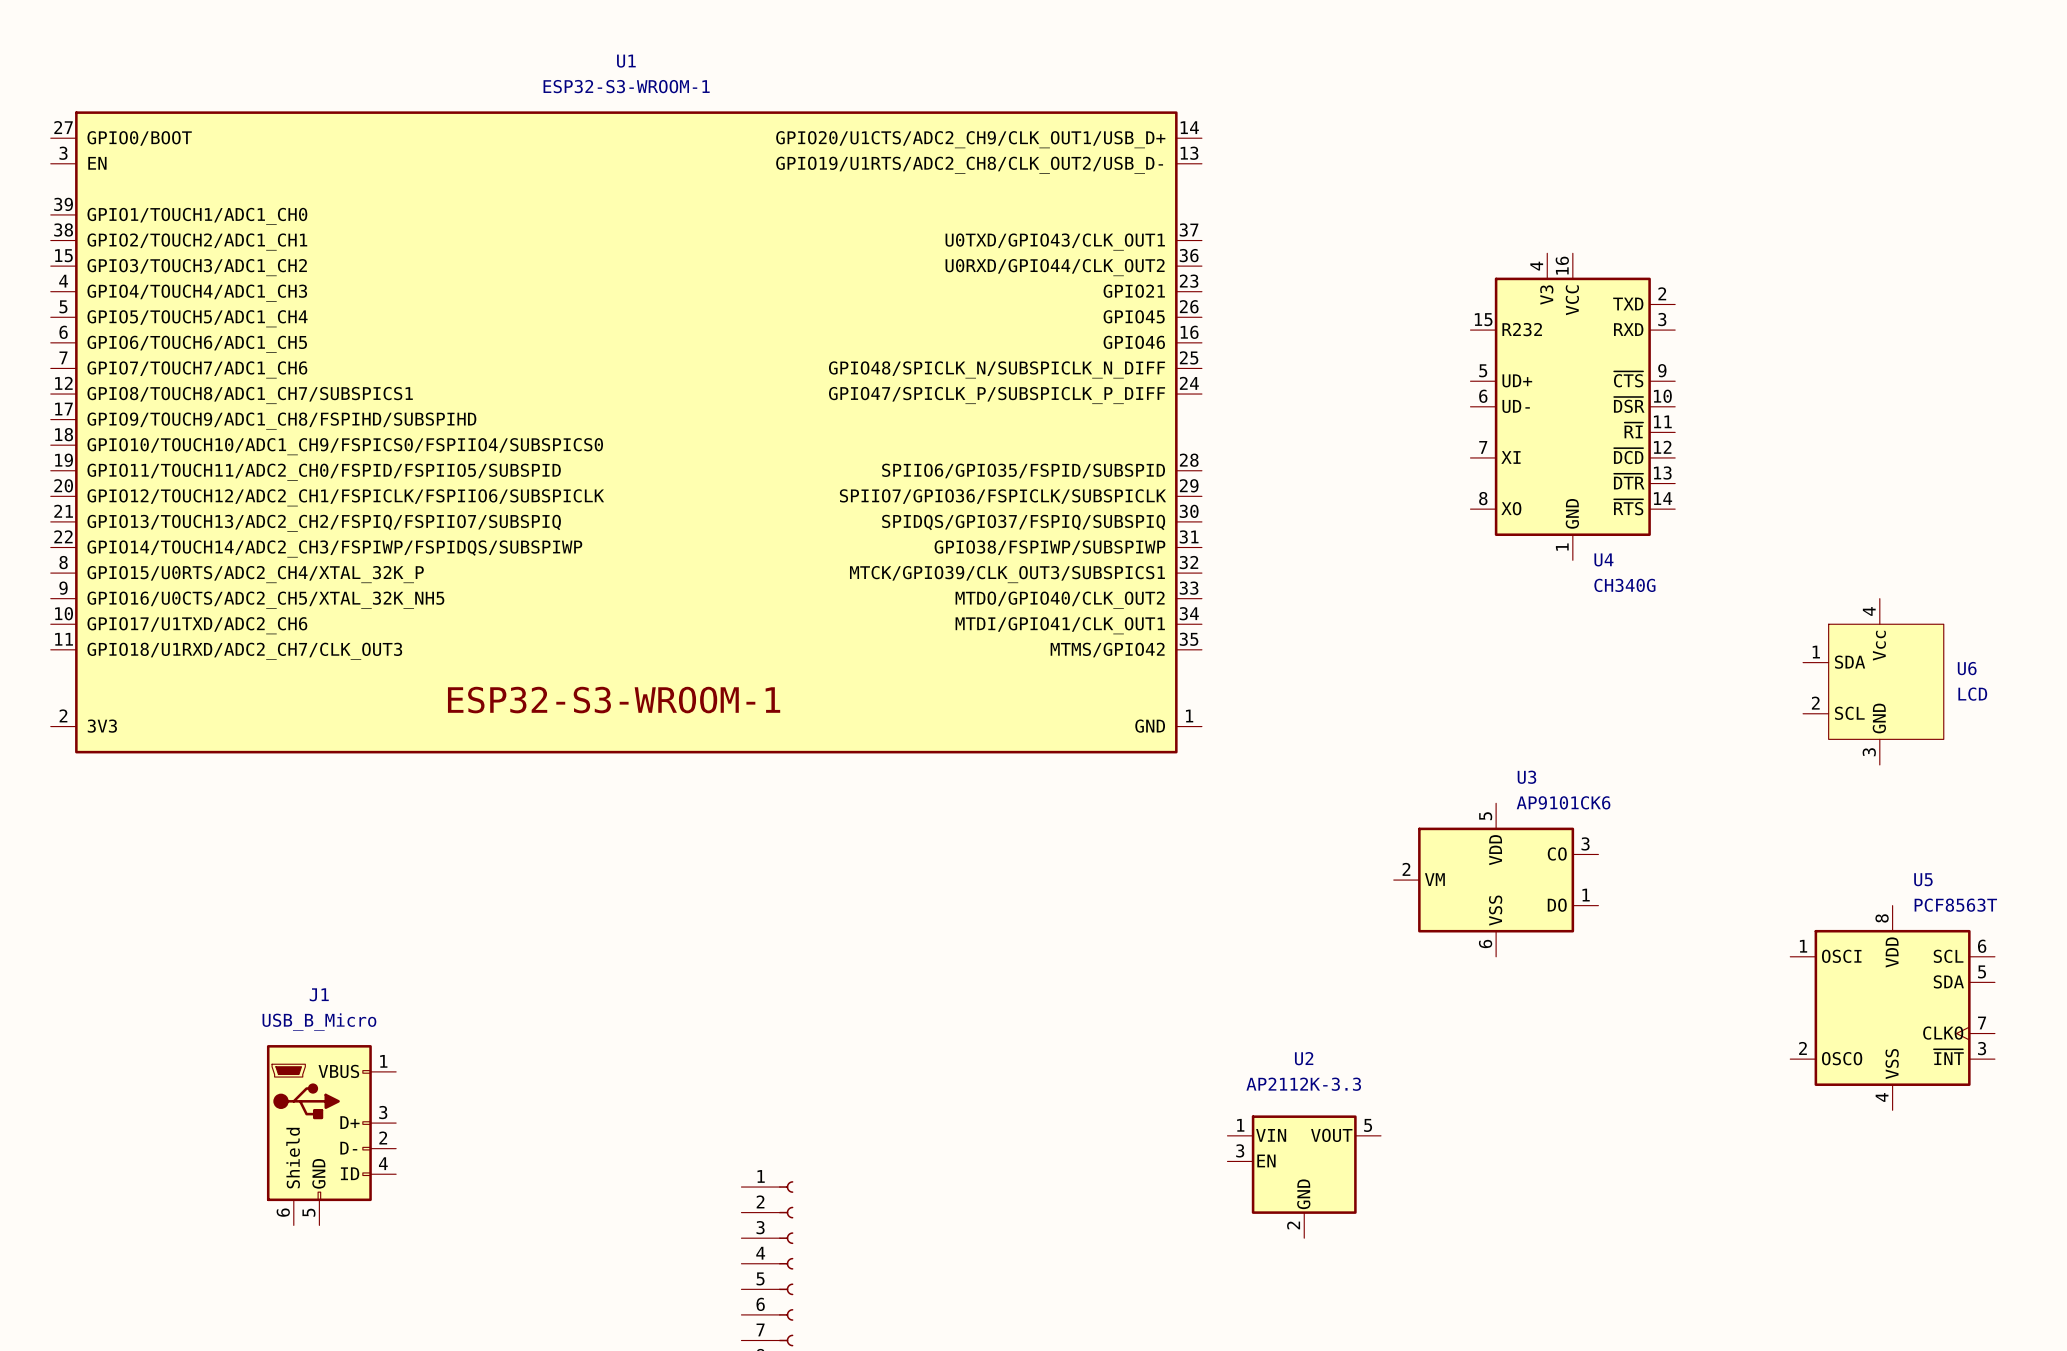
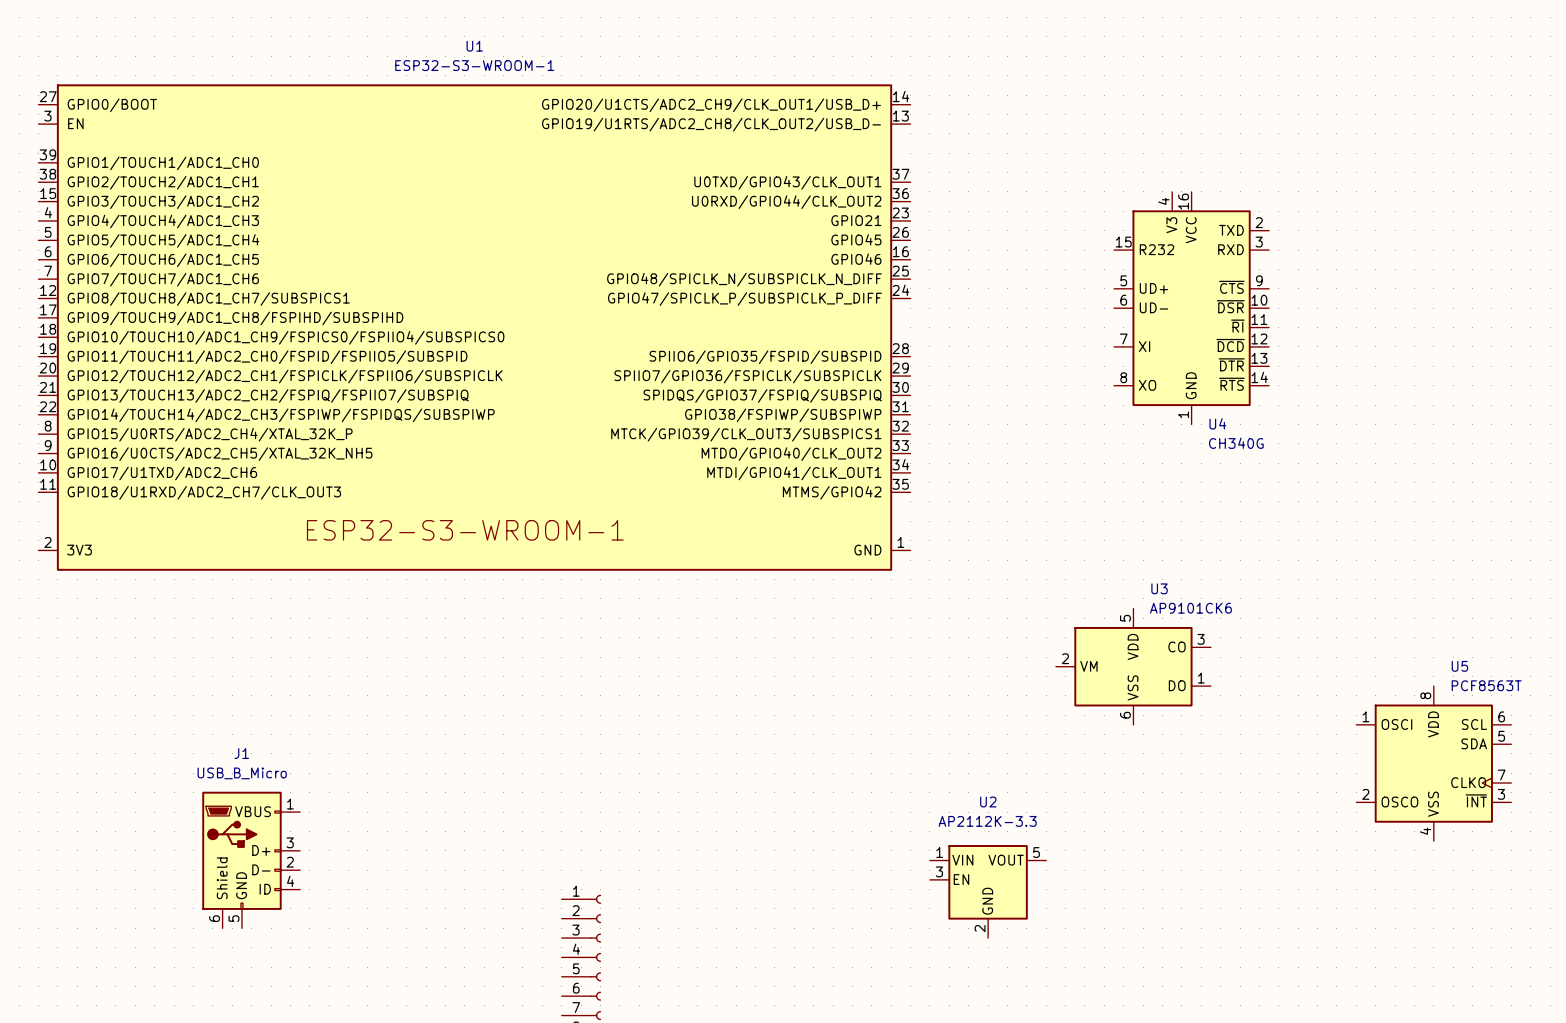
U6: LCD (1873, 681) -> none

